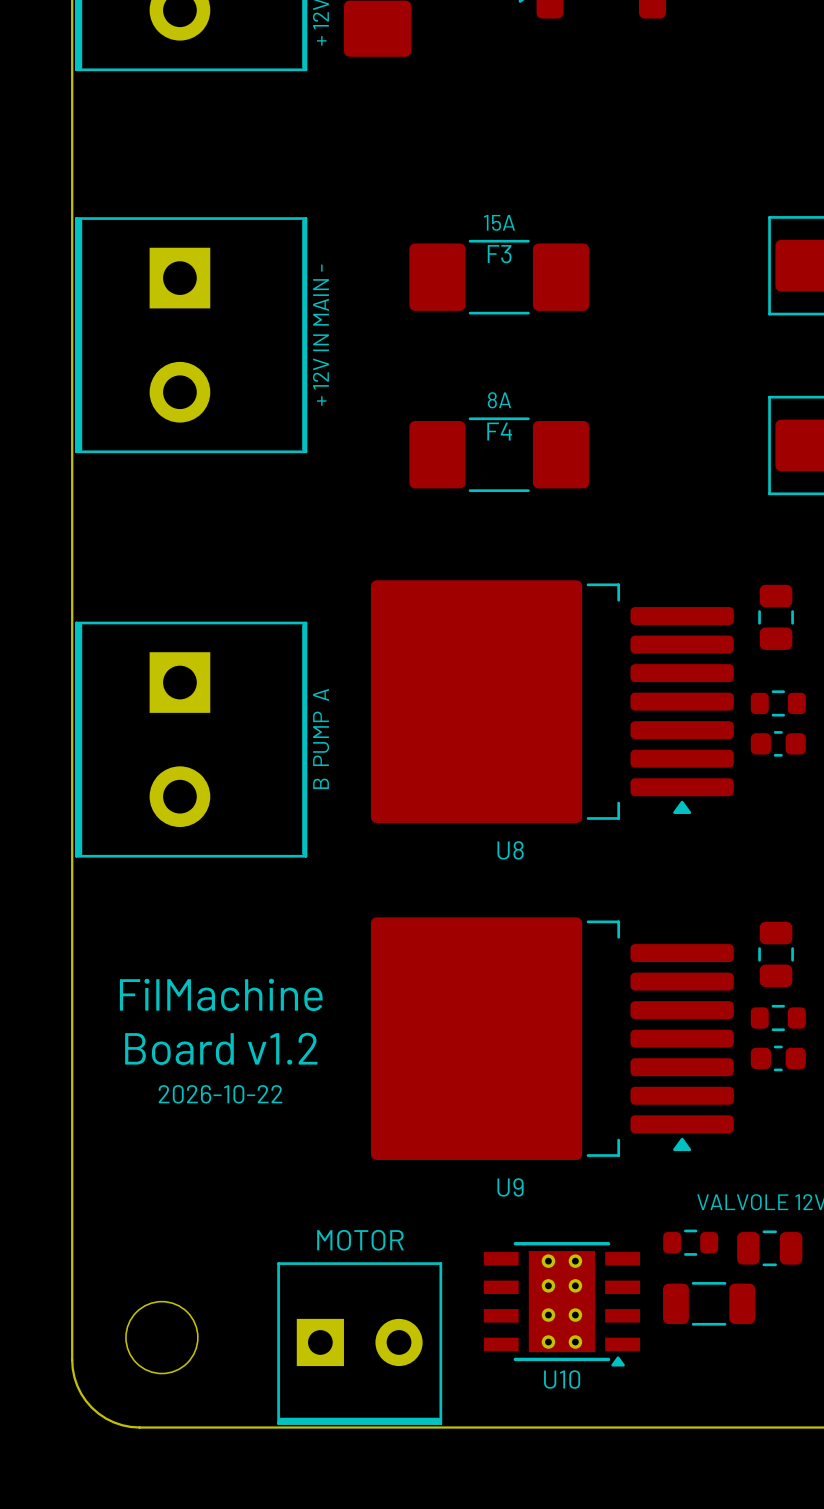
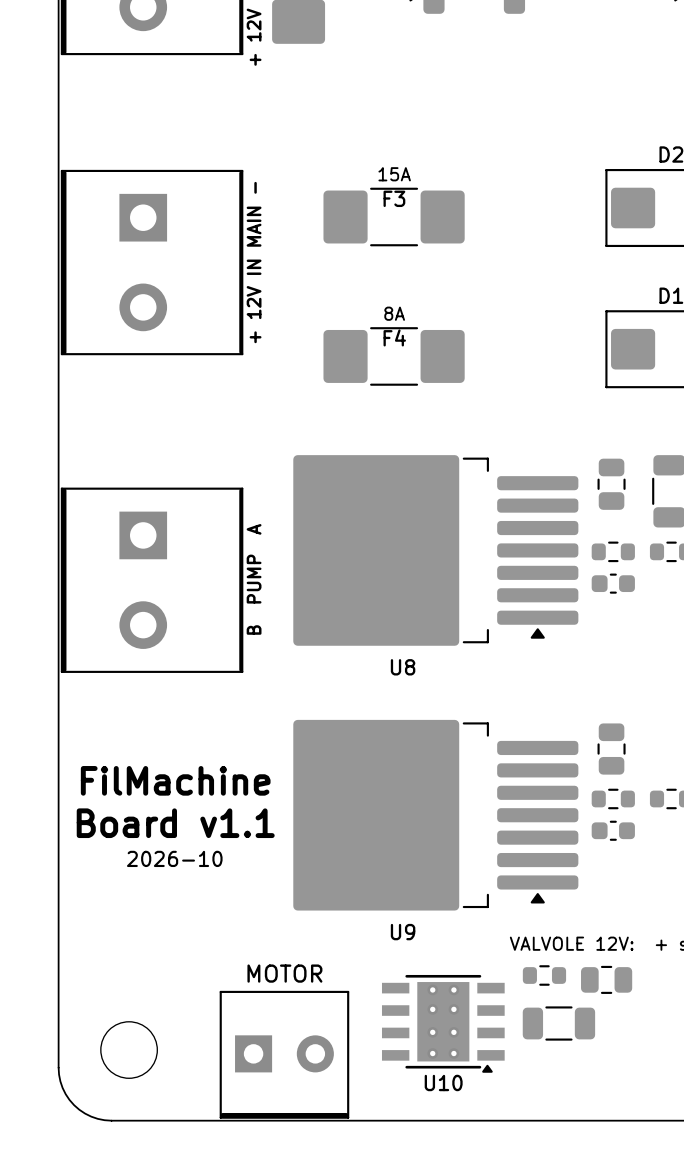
text: Board v1.2 (221, 1048) -> Board v1.1 (175, 823)
text: 2026-10-22 (220, 1094) -> 2026-10 (174, 858)

